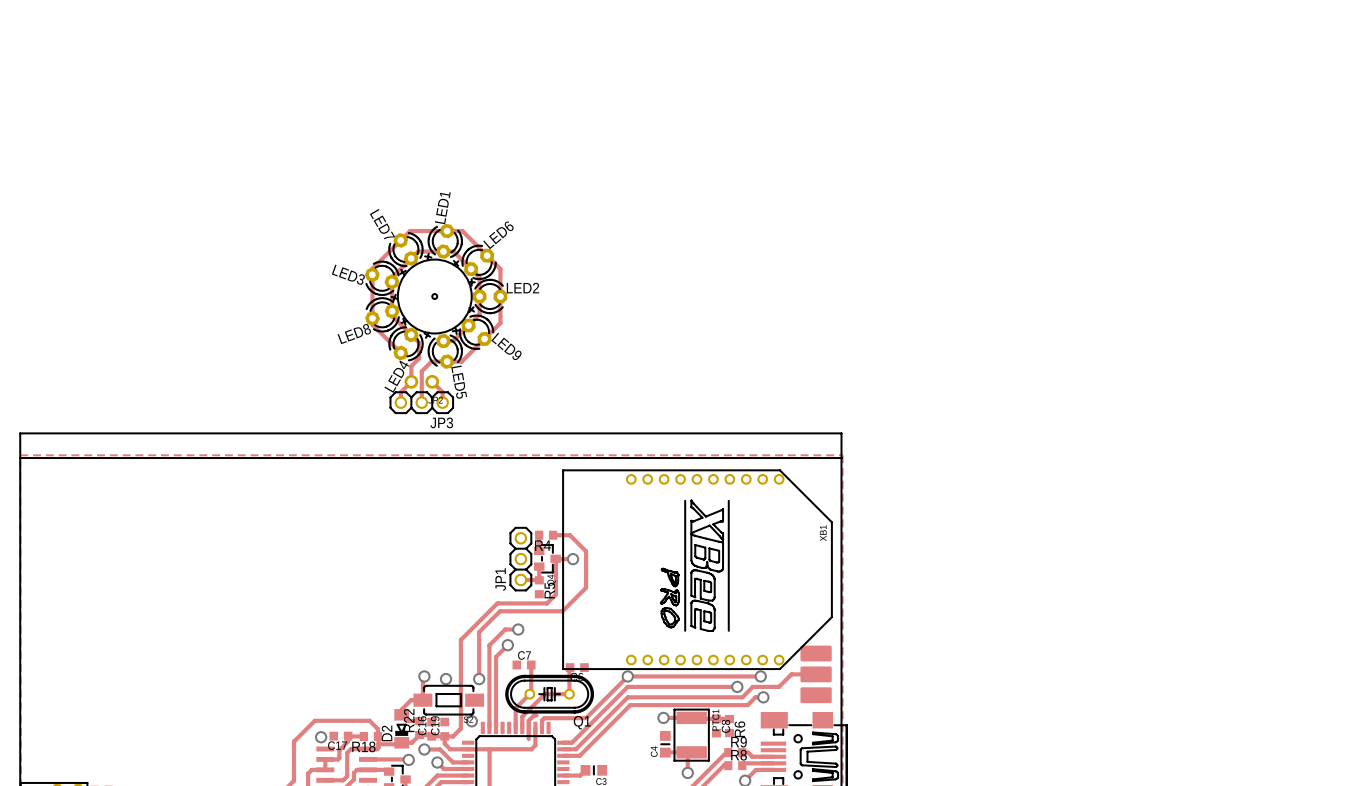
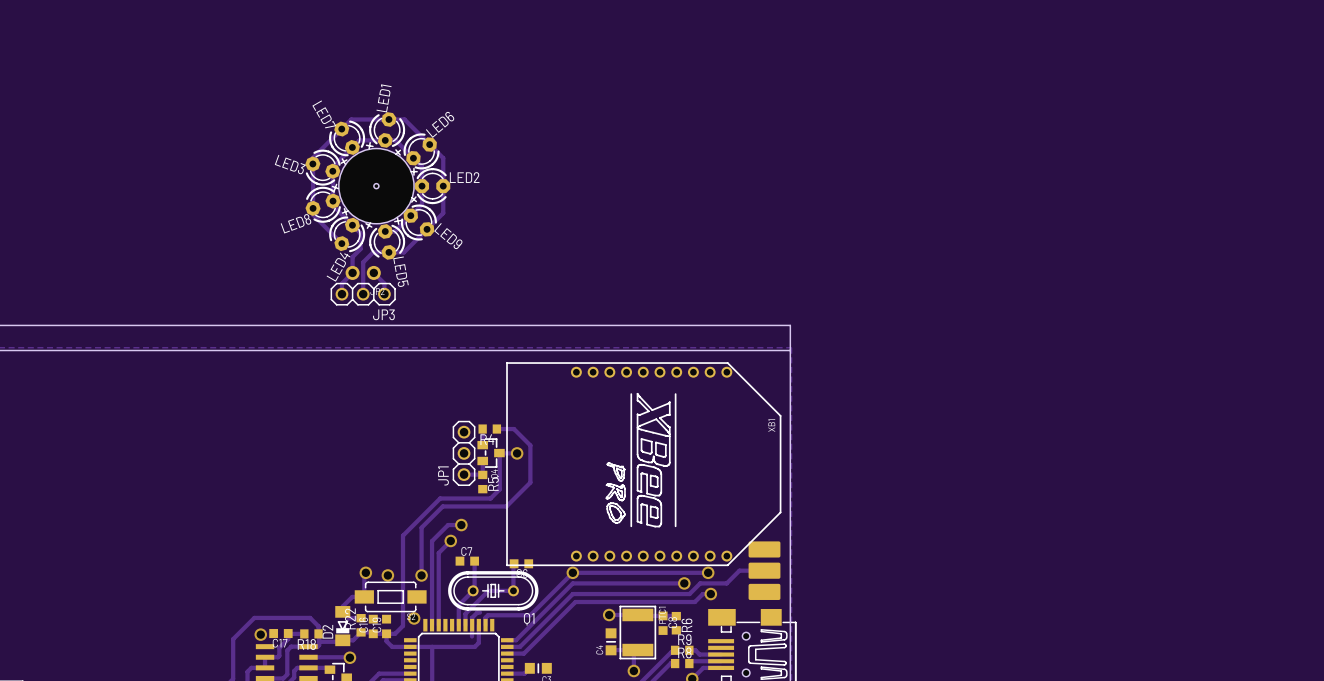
track: (424, 749) (440, 749) (452, 762) (468, 762) -> none
via: (424, 749) -> none
track: (437, 762) (443, 768) (468, 768) -> none
via: (437, 762) -> none

